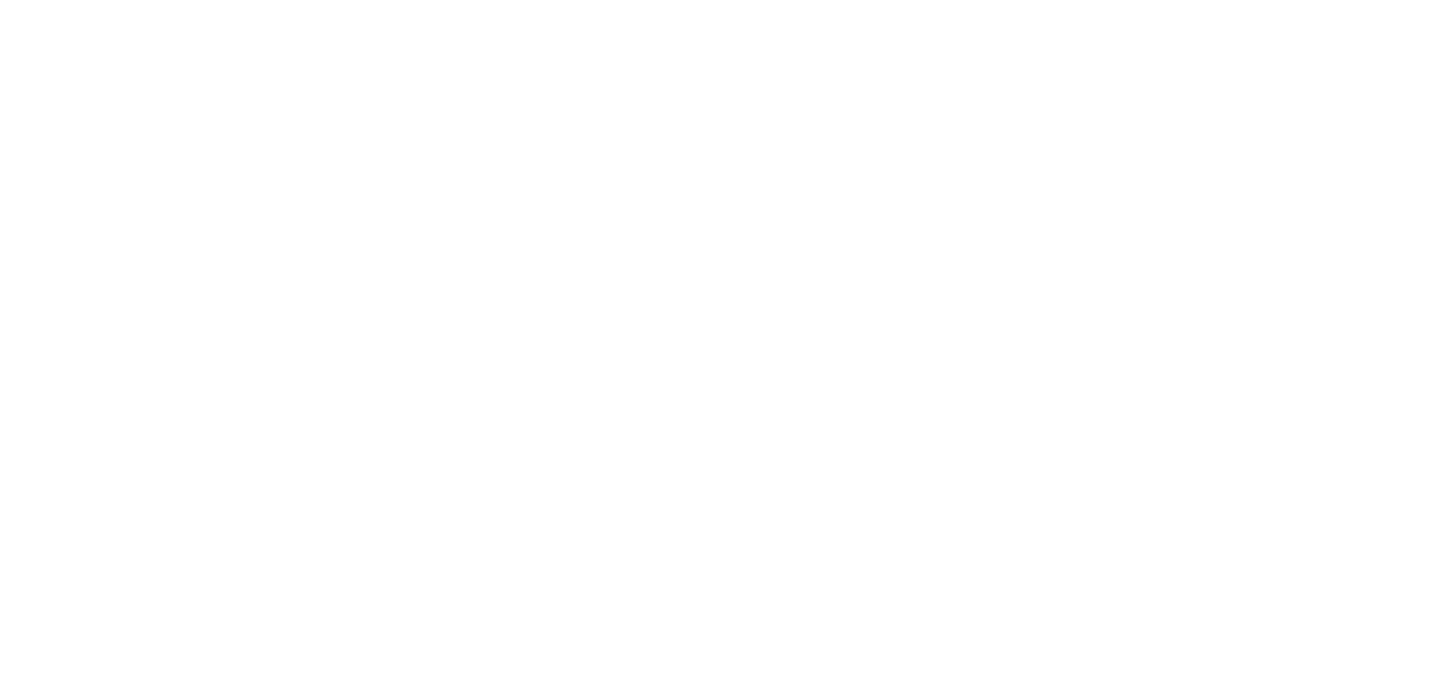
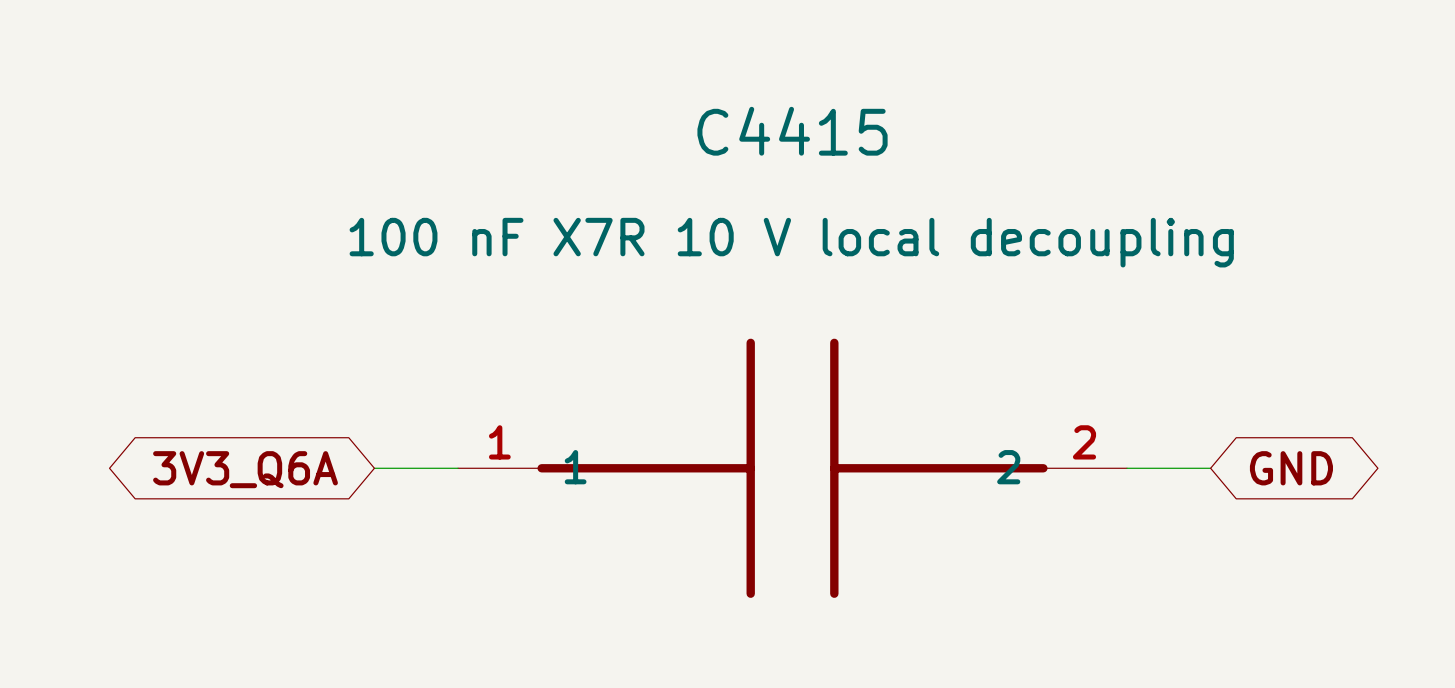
wire: none -> (374, 468) (458, 468)
C4415: none -> 100 nF X7R 10 V local decoupling (792, 468)
wire: none -> (1127, 468) (1210, 468)
global label: none -> GND (1291, 468)
global label: none -> 3V3_Q6A (245, 469)

